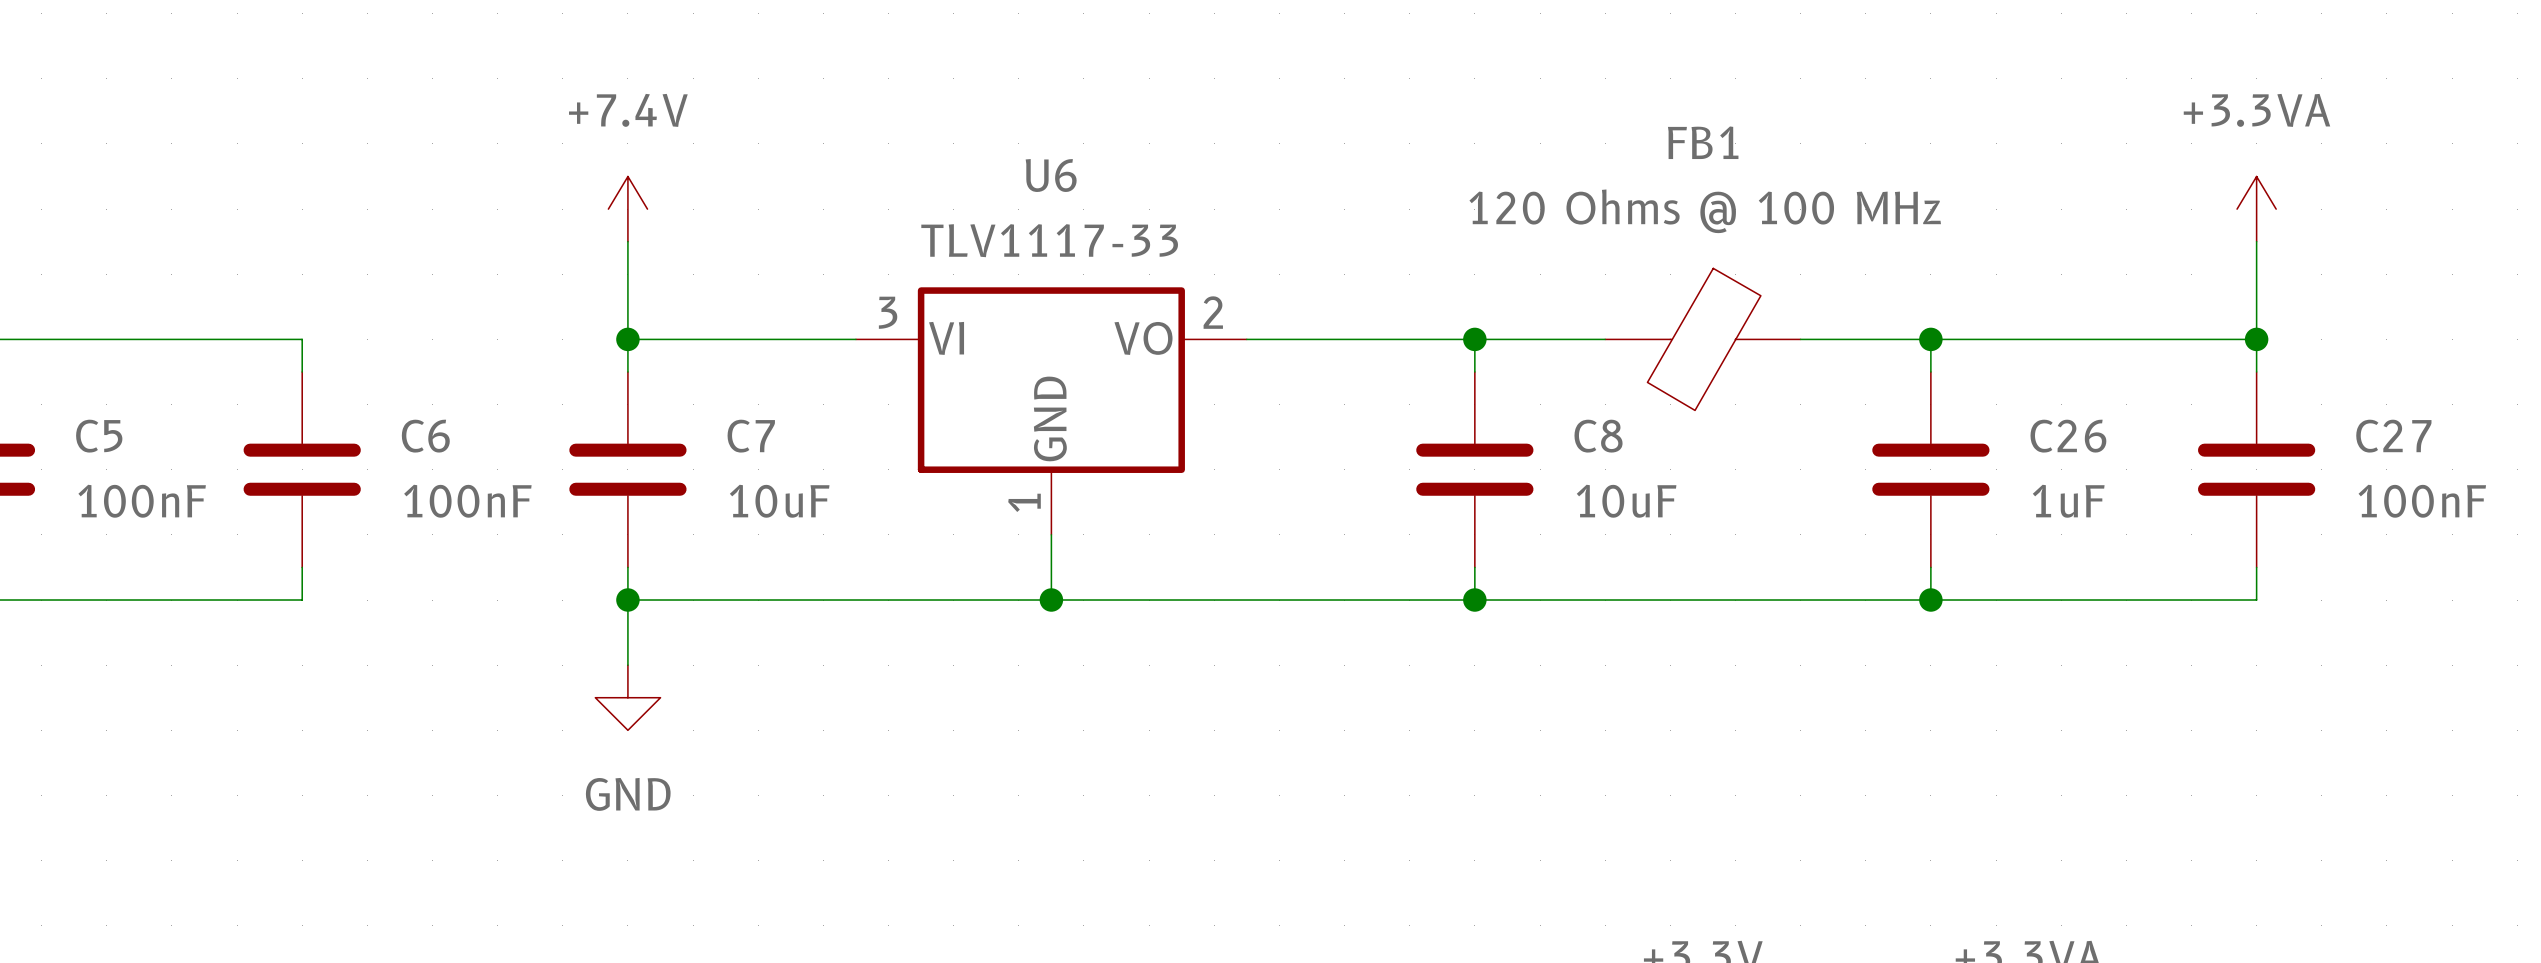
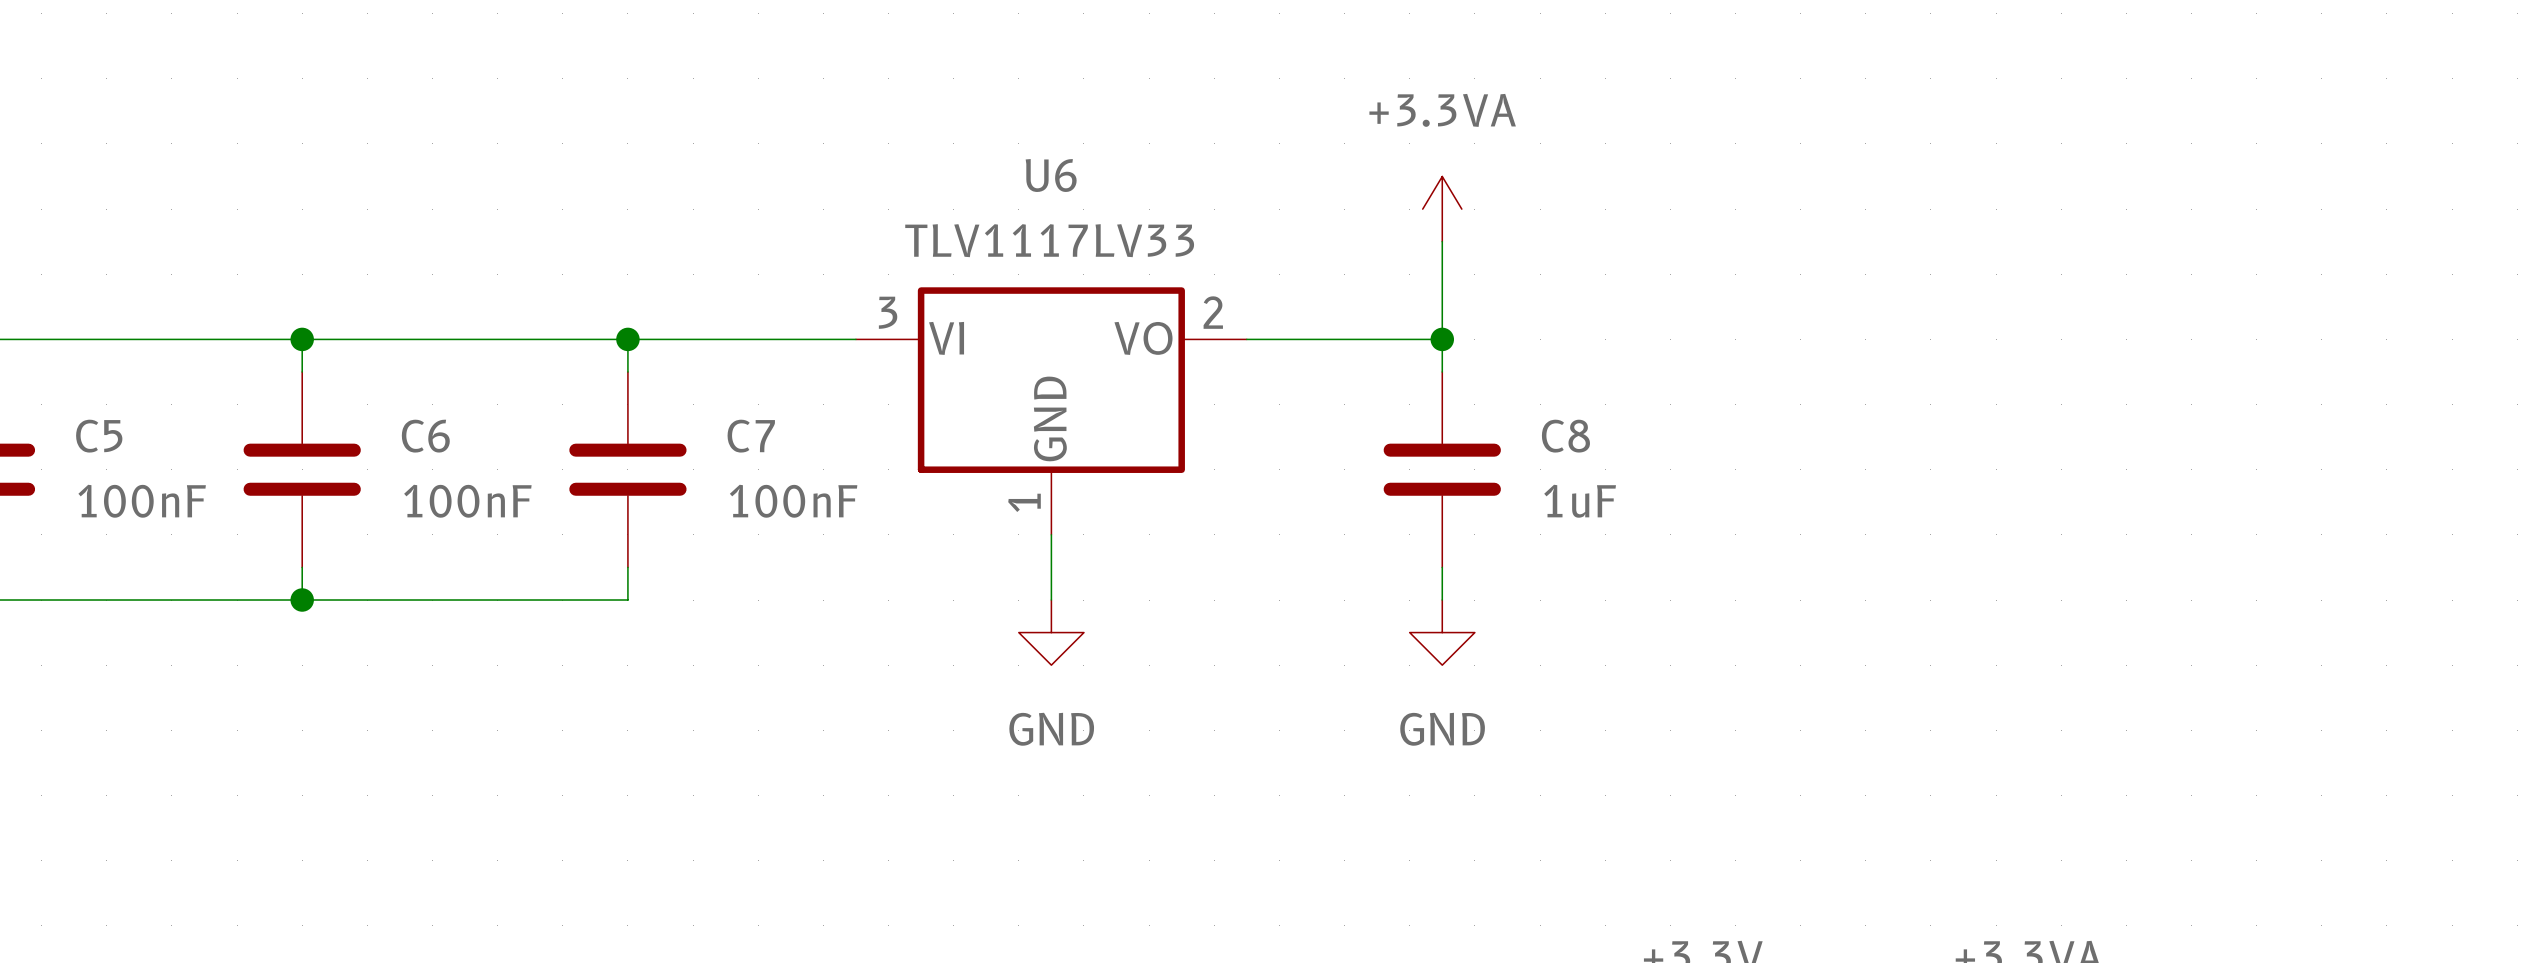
power symbol: +7.4V (627, 209) -> none
power symbol: none -> +3.3VA (1442, 209)
power symbol: +3.3VA (2256, 209) -> none
U6 value: TLV1117-33 (1049, 240) -> TLV1117LV33 (1049, 240)
wire: (627, 241) (627, 339) -> (302, 339) (627, 339)
wire: none -> (1442, 241) (1442, 371)
wire: (2256, 241) (2256, 371) -> none
junction: none -> (302, 339)
wire: (1442, 339) (1605, 339) -> none
wire: (1474, 339) (1474, 371) -> none
junction position: (1474, 339) -> (1442, 339)
FB1: 120 Ohms @ 100 MHz (1702, 339) -> none
wire: (1800, 339) (2256, 339) -> none
wire: (1930, 339) (1930, 371) -> none
junction: (1930, 339) -> none
junction: (2256, 339) -> none
C8 position: (1474, 469) -> (1442, 469)
C26: 1uF (1930, 469) -> none
C27: 100nF (2256, 469) -> none
C7 value: 10uF (779, 501) -> 100nF (793, 501)
C8 value: 10uF (1626, 501) -> 1uF (1580, 501)
wire: (1474, 567) (1474, 600) -> (1442, 567) (1442, 600)
wire: (1930, 567) (1930, 600) -> none
wire: (2256, 567) (2256, 600) (627, 600) (627, 665) -> none
wire: none -> (302, 600) (627, 600)
junction: none -> (302, 600)
junction: (627, 600) -> none
junction: (1051, 600) -> none
junction: (1474, 600) -> none
junction: (1930, 600) -> none
power symbol: none -> GND (1051, 632)
power symbol: none -> GND (1442, 632)
power symbol: GND (627, 697) -> none

